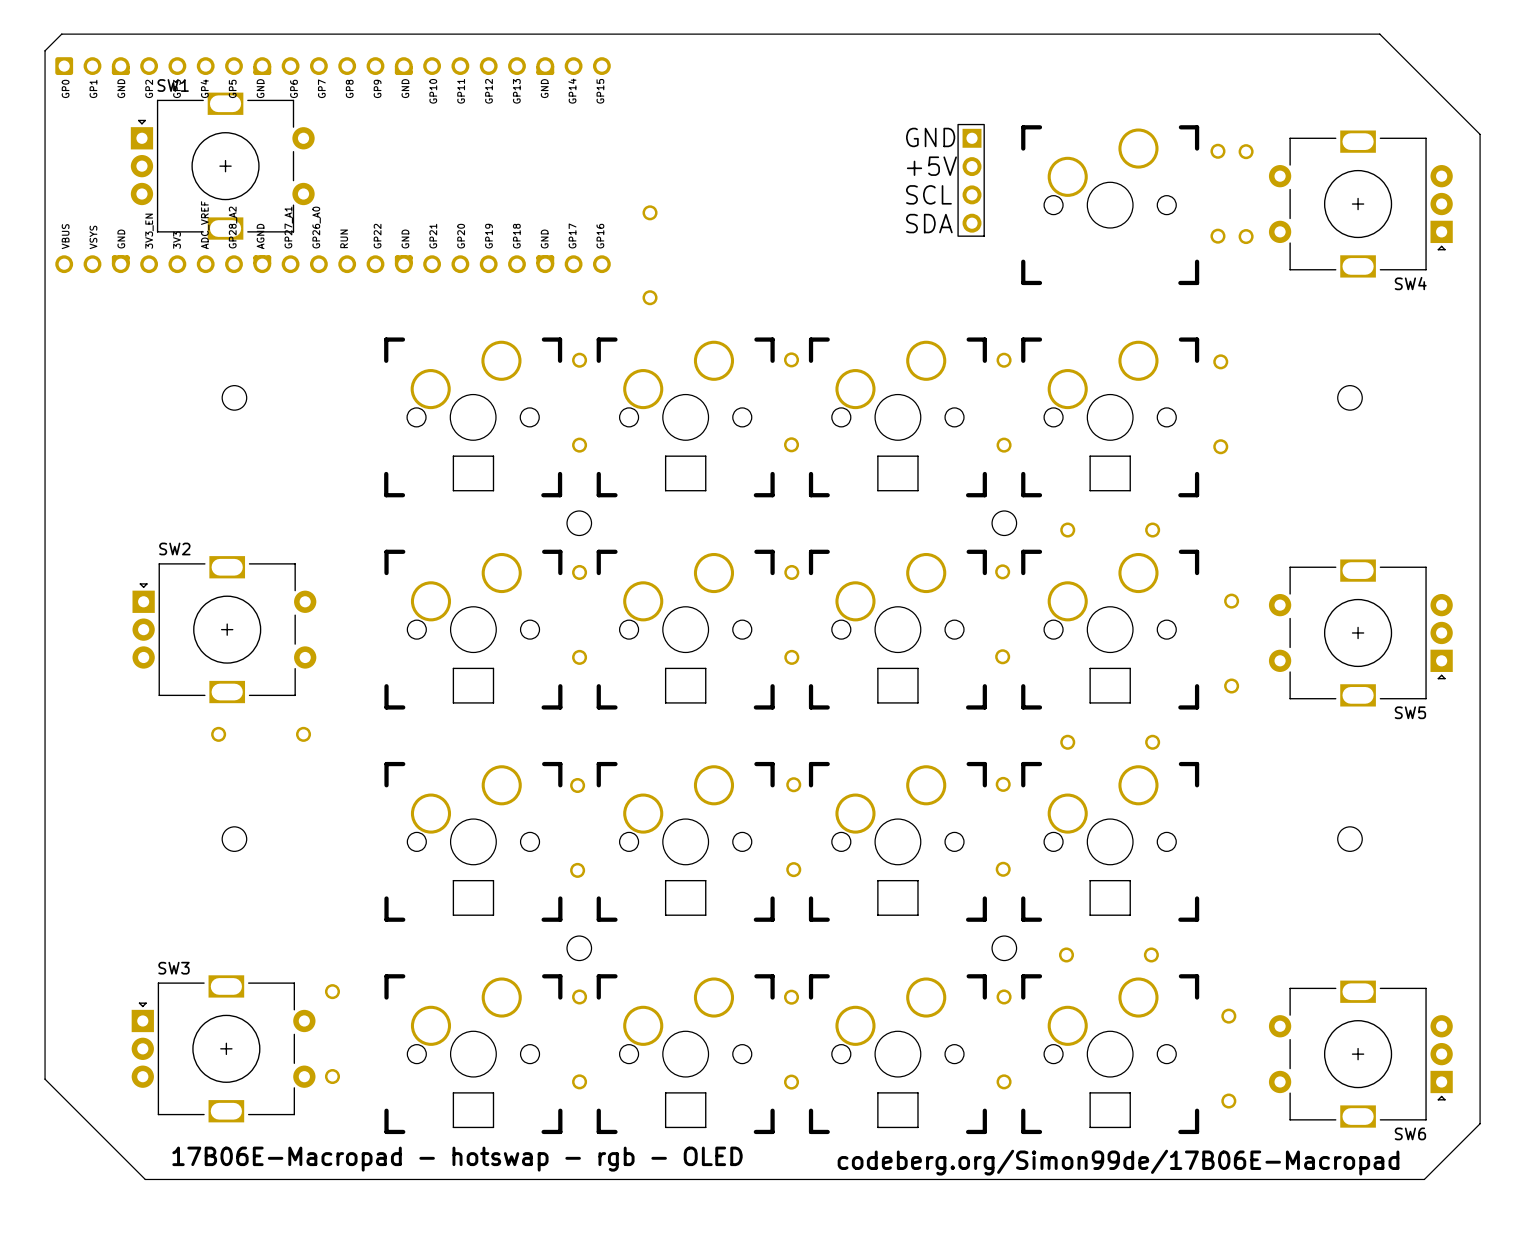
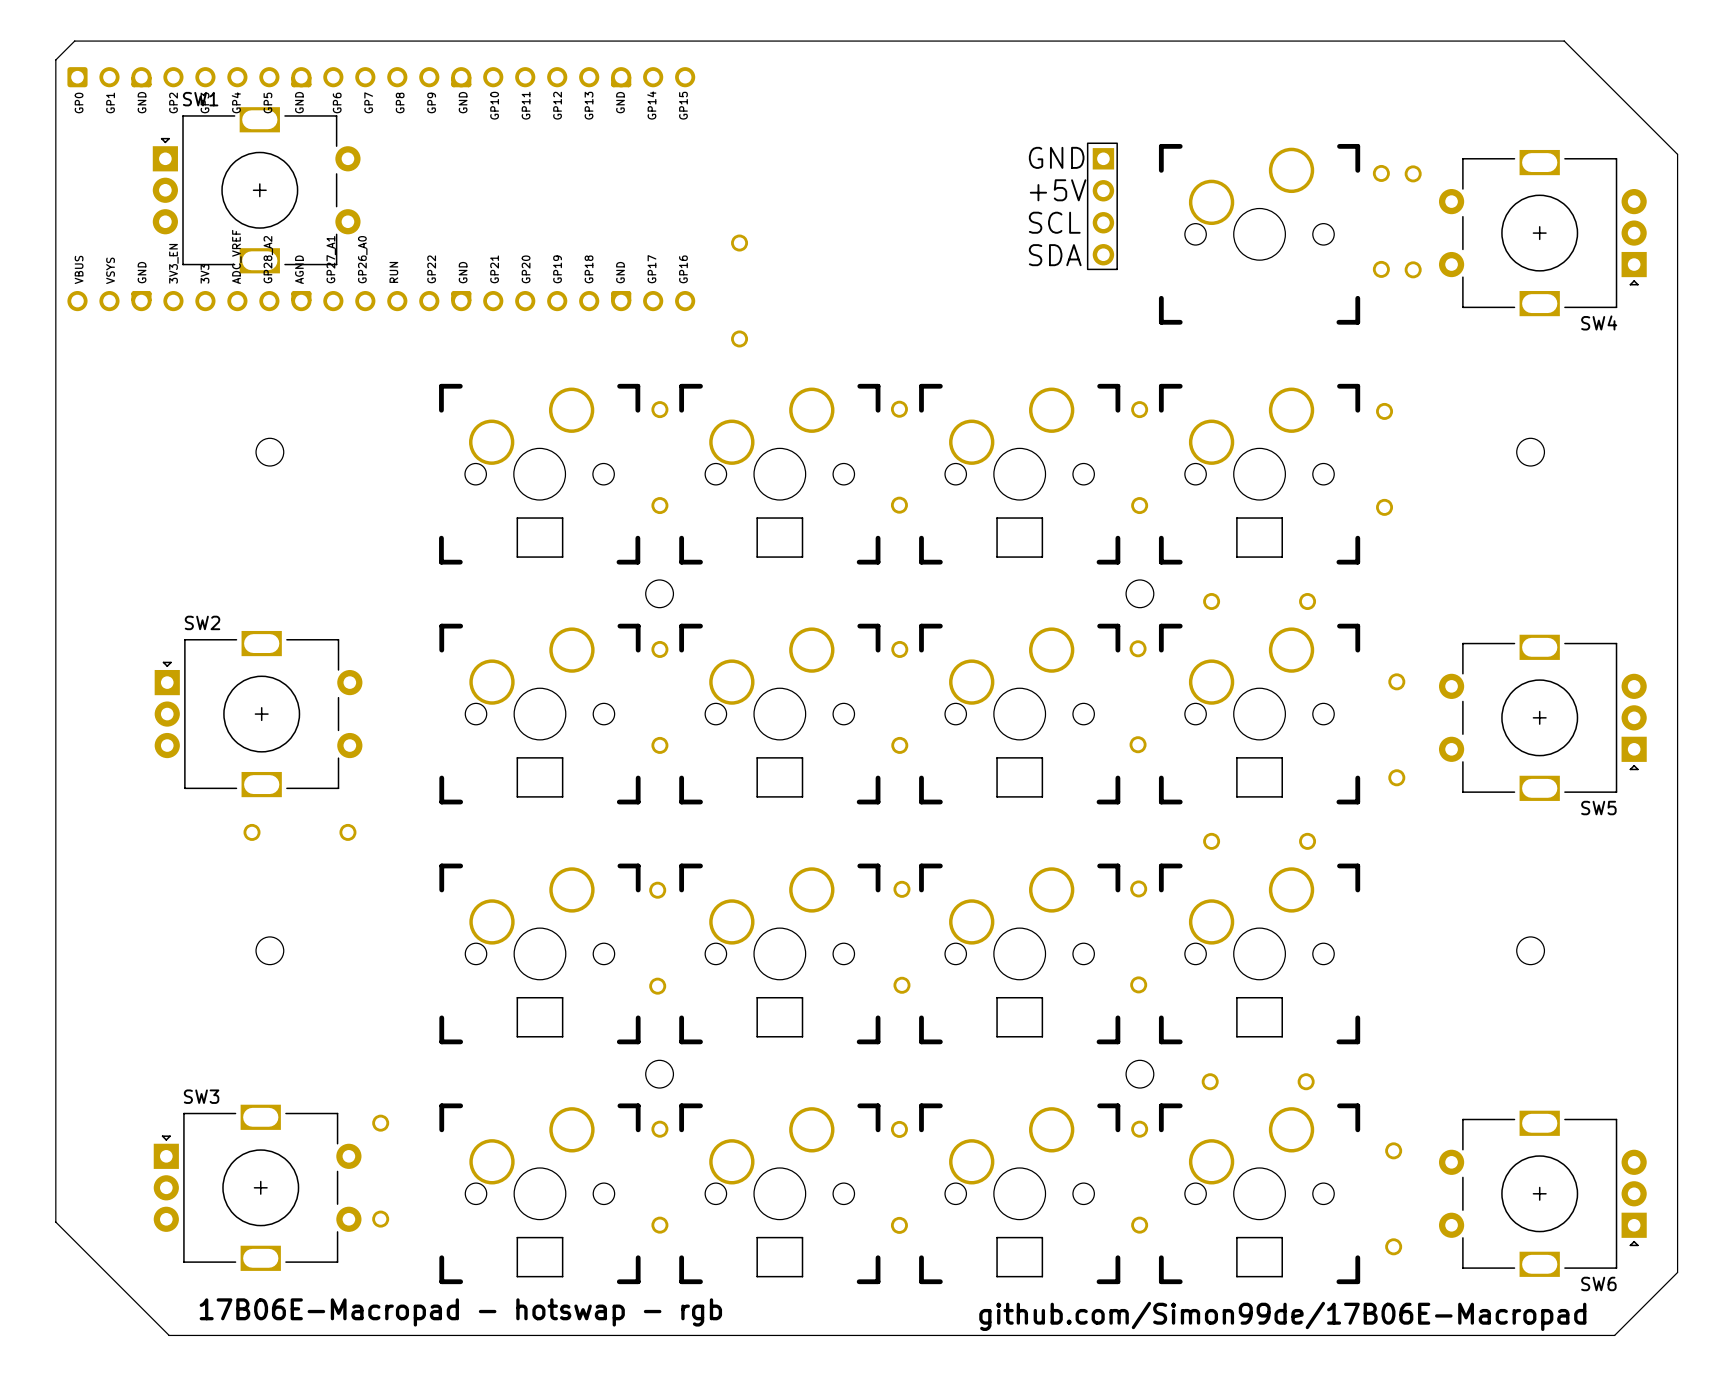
text: 17B06E-Macropad - hotswap - rgb - OLED (457, 1159) -> 17B06E-Macropad - hotswap - rgb (460, 1312)
text: codeberg.org/Simon99de/17B06E-Macropad (1118, 1162) -> github.com/Simon99de/17B06E-Macropad (1282, 1316)

